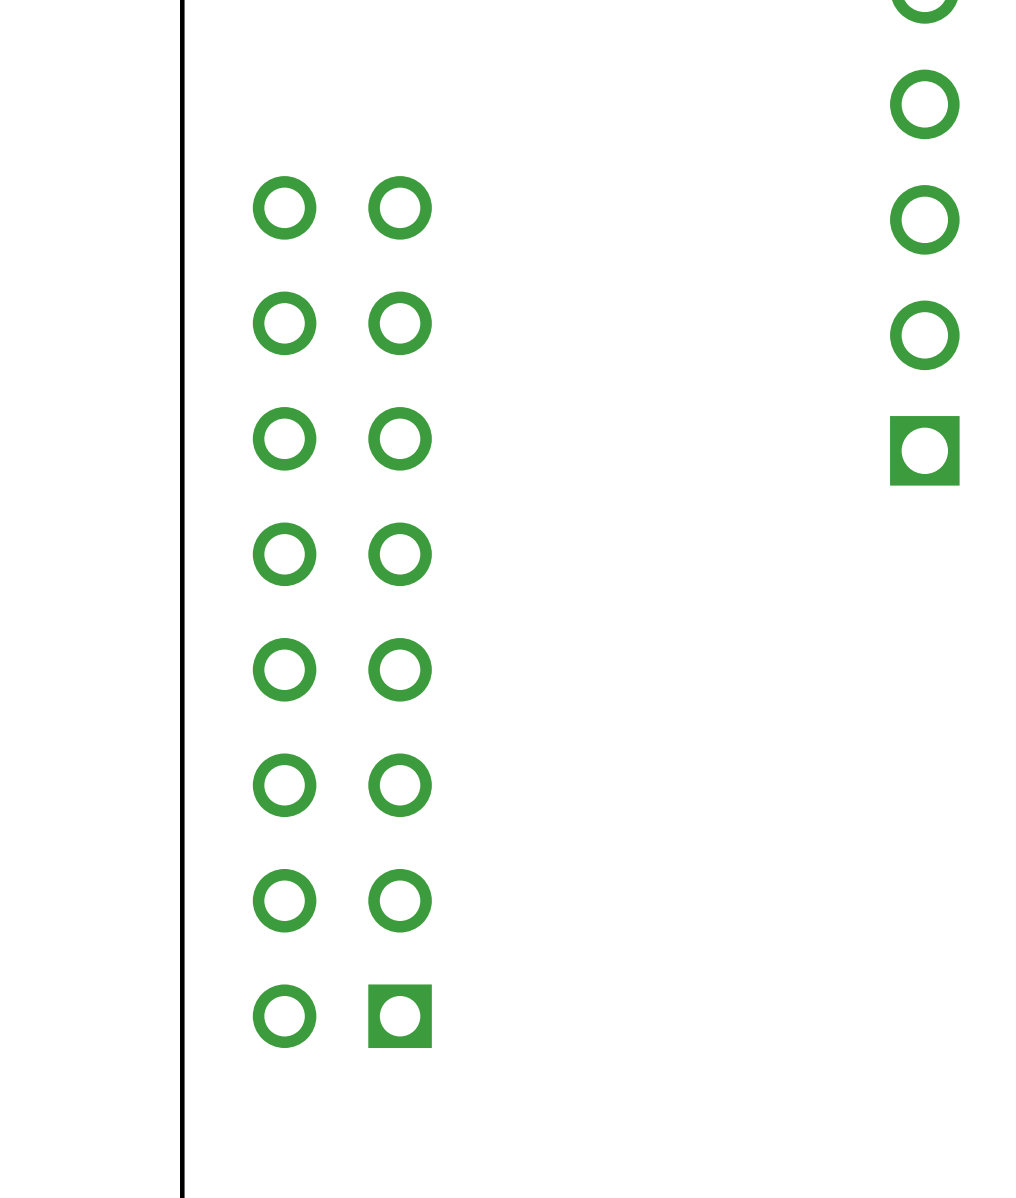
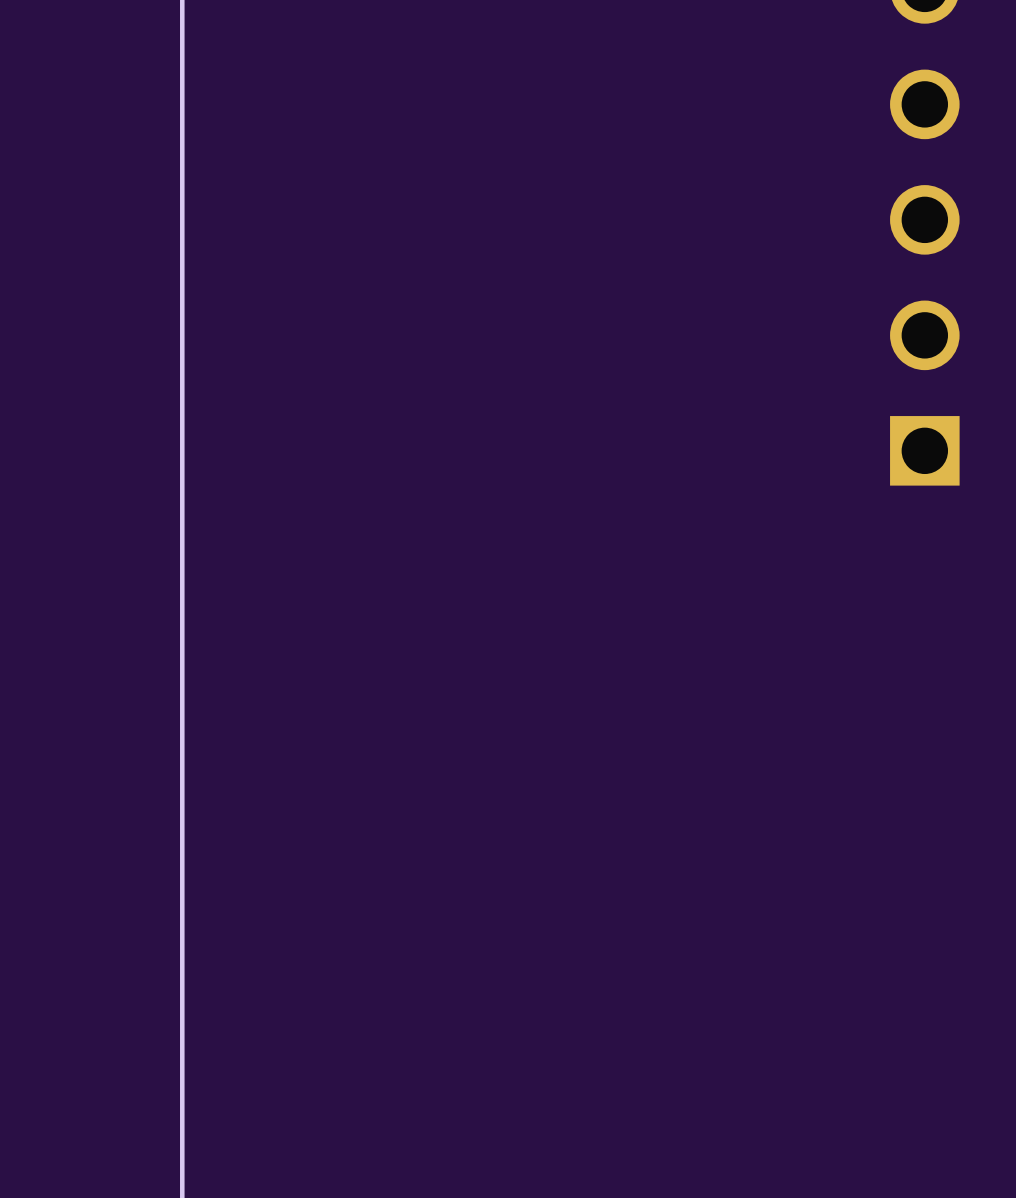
part: (342, 612) -> none

